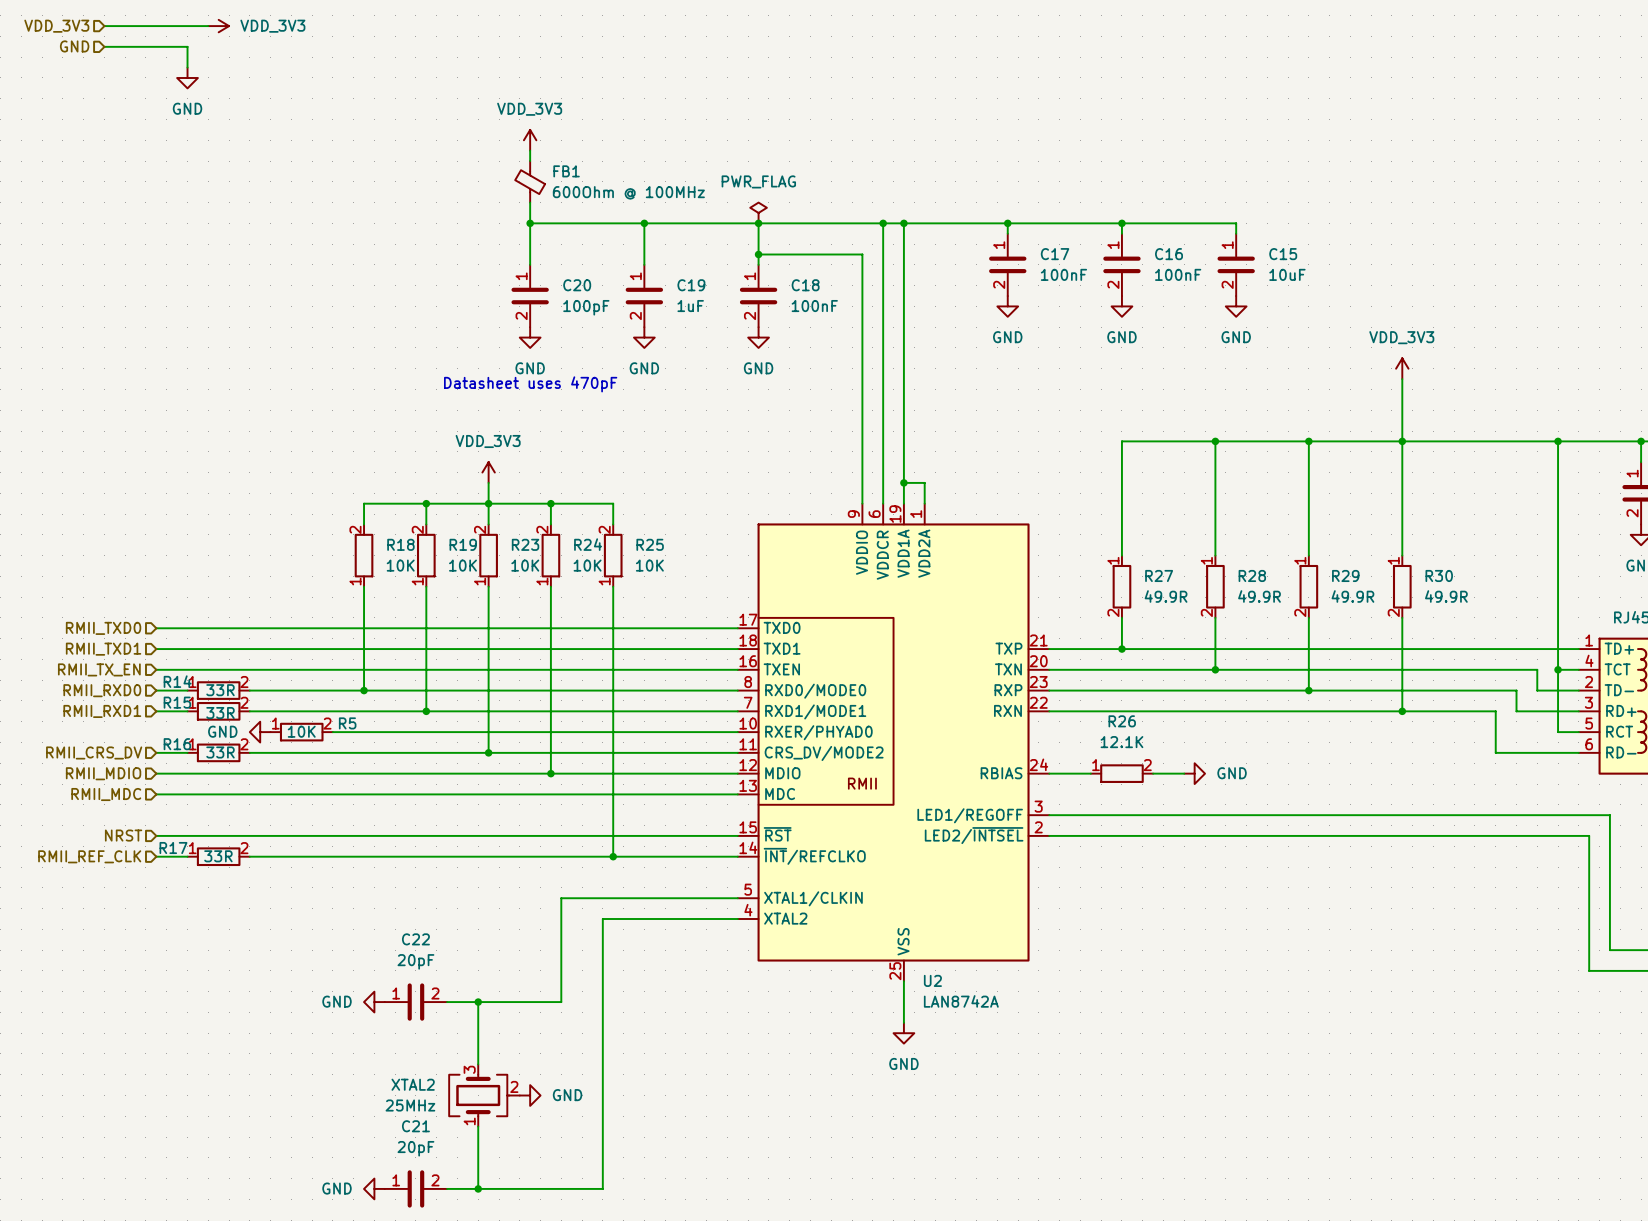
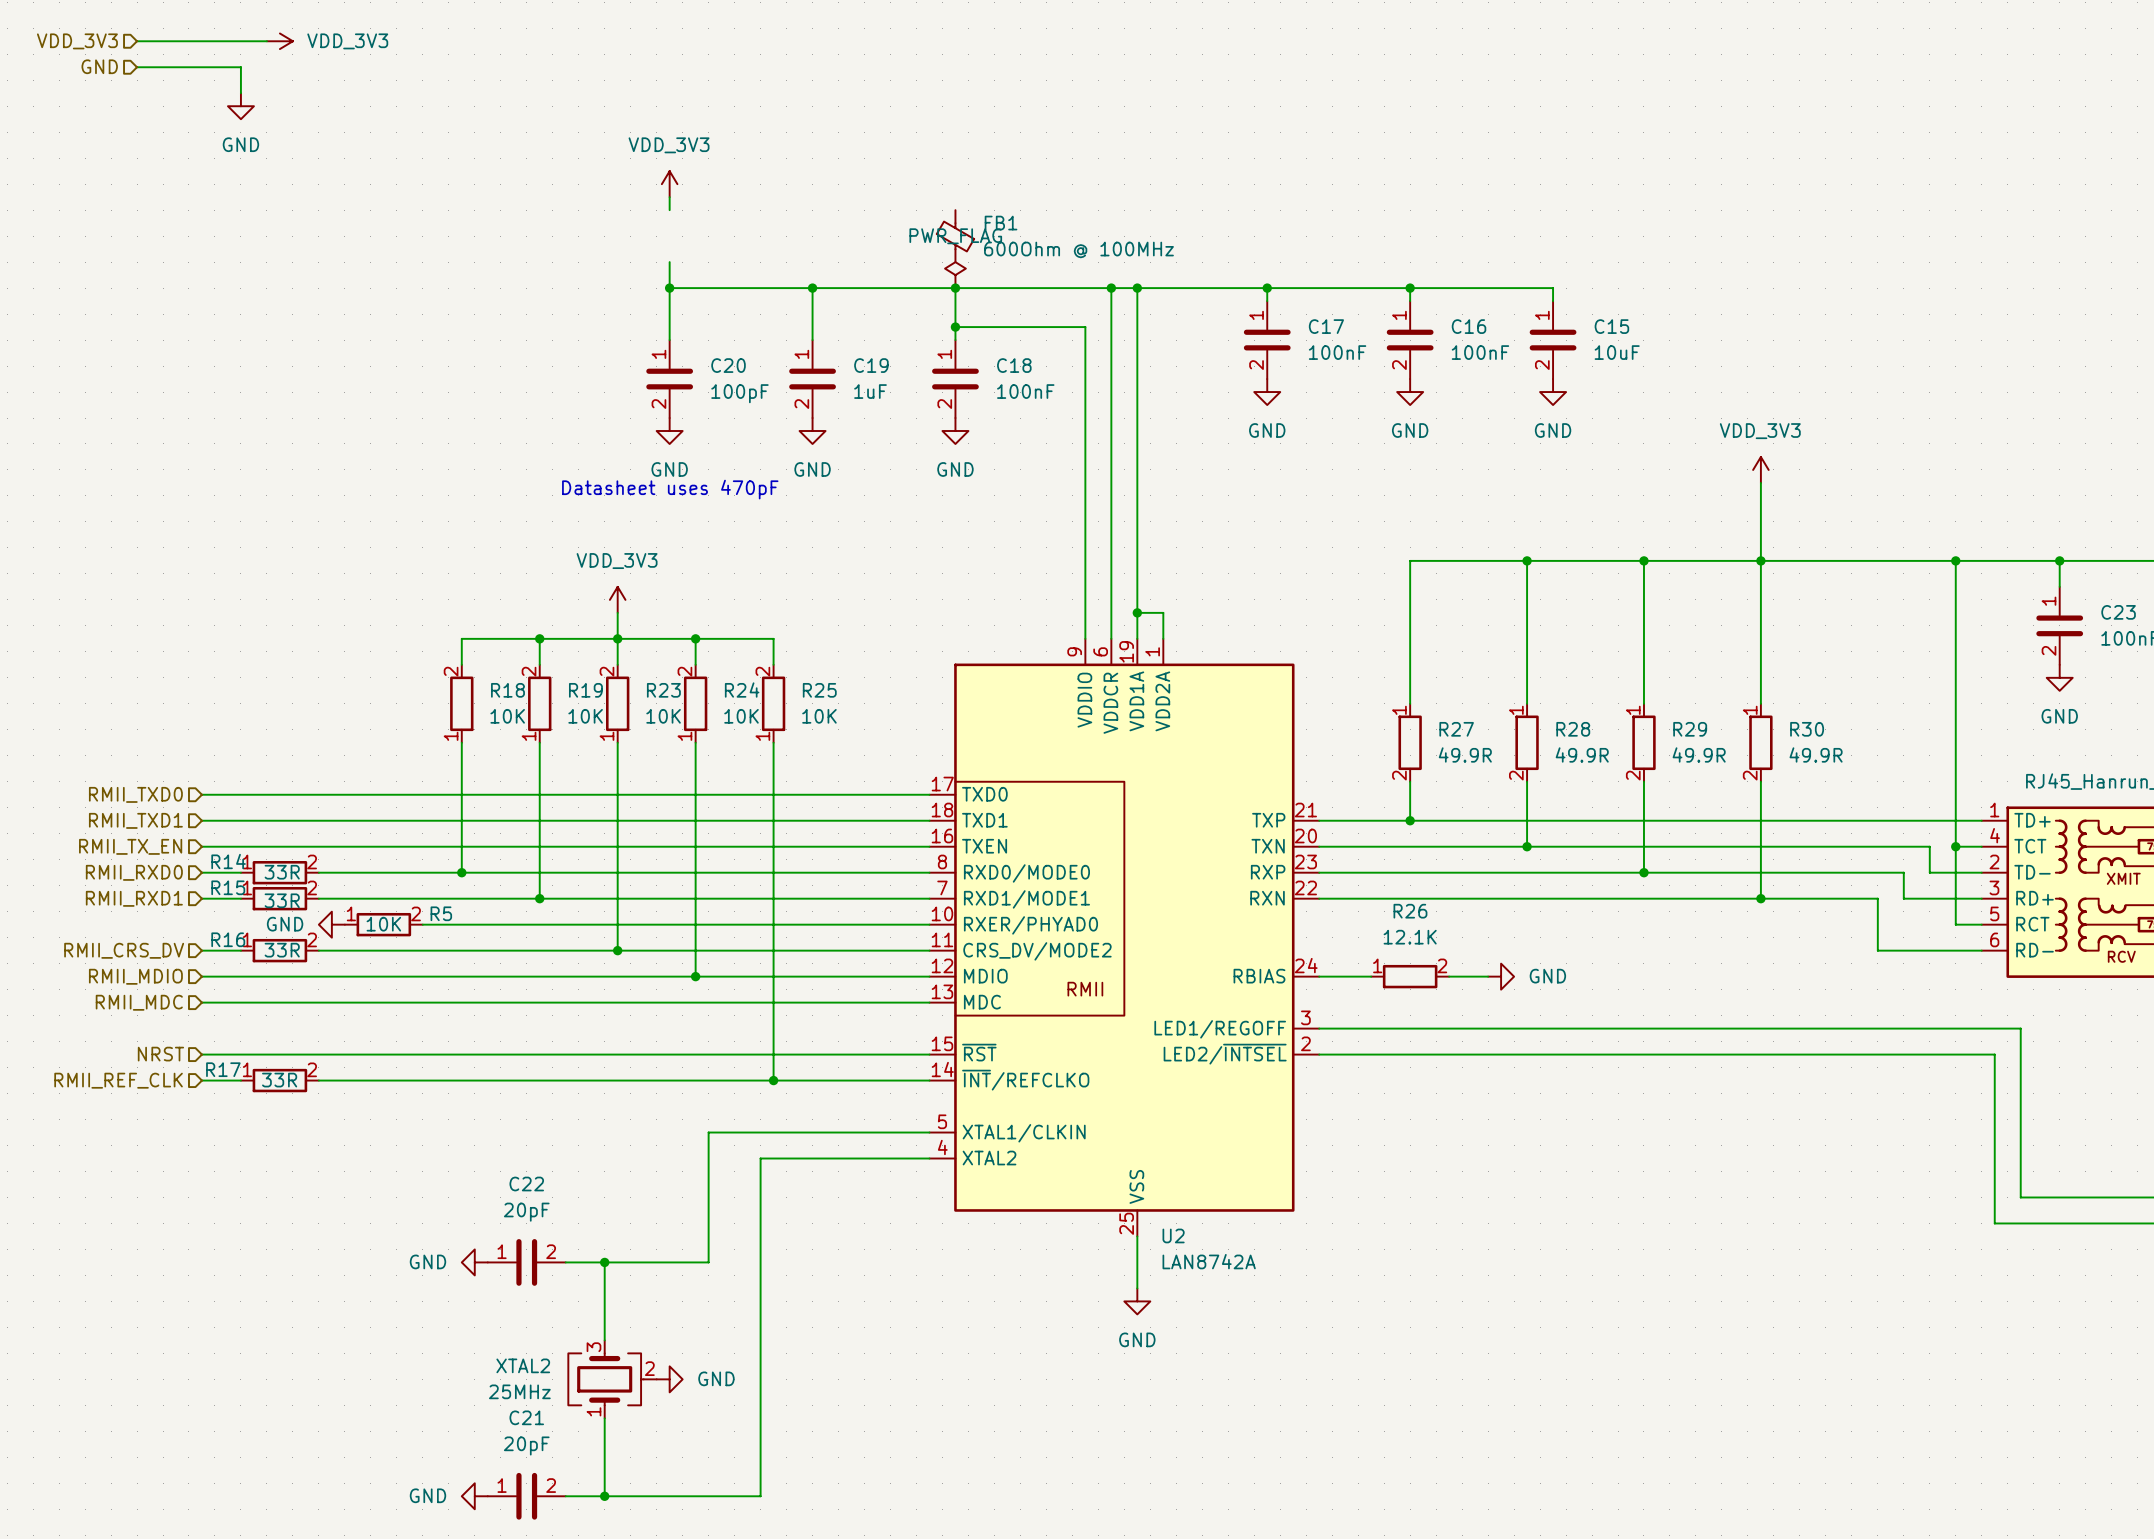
FB1 position: (530, 181) -> (955, 236)

